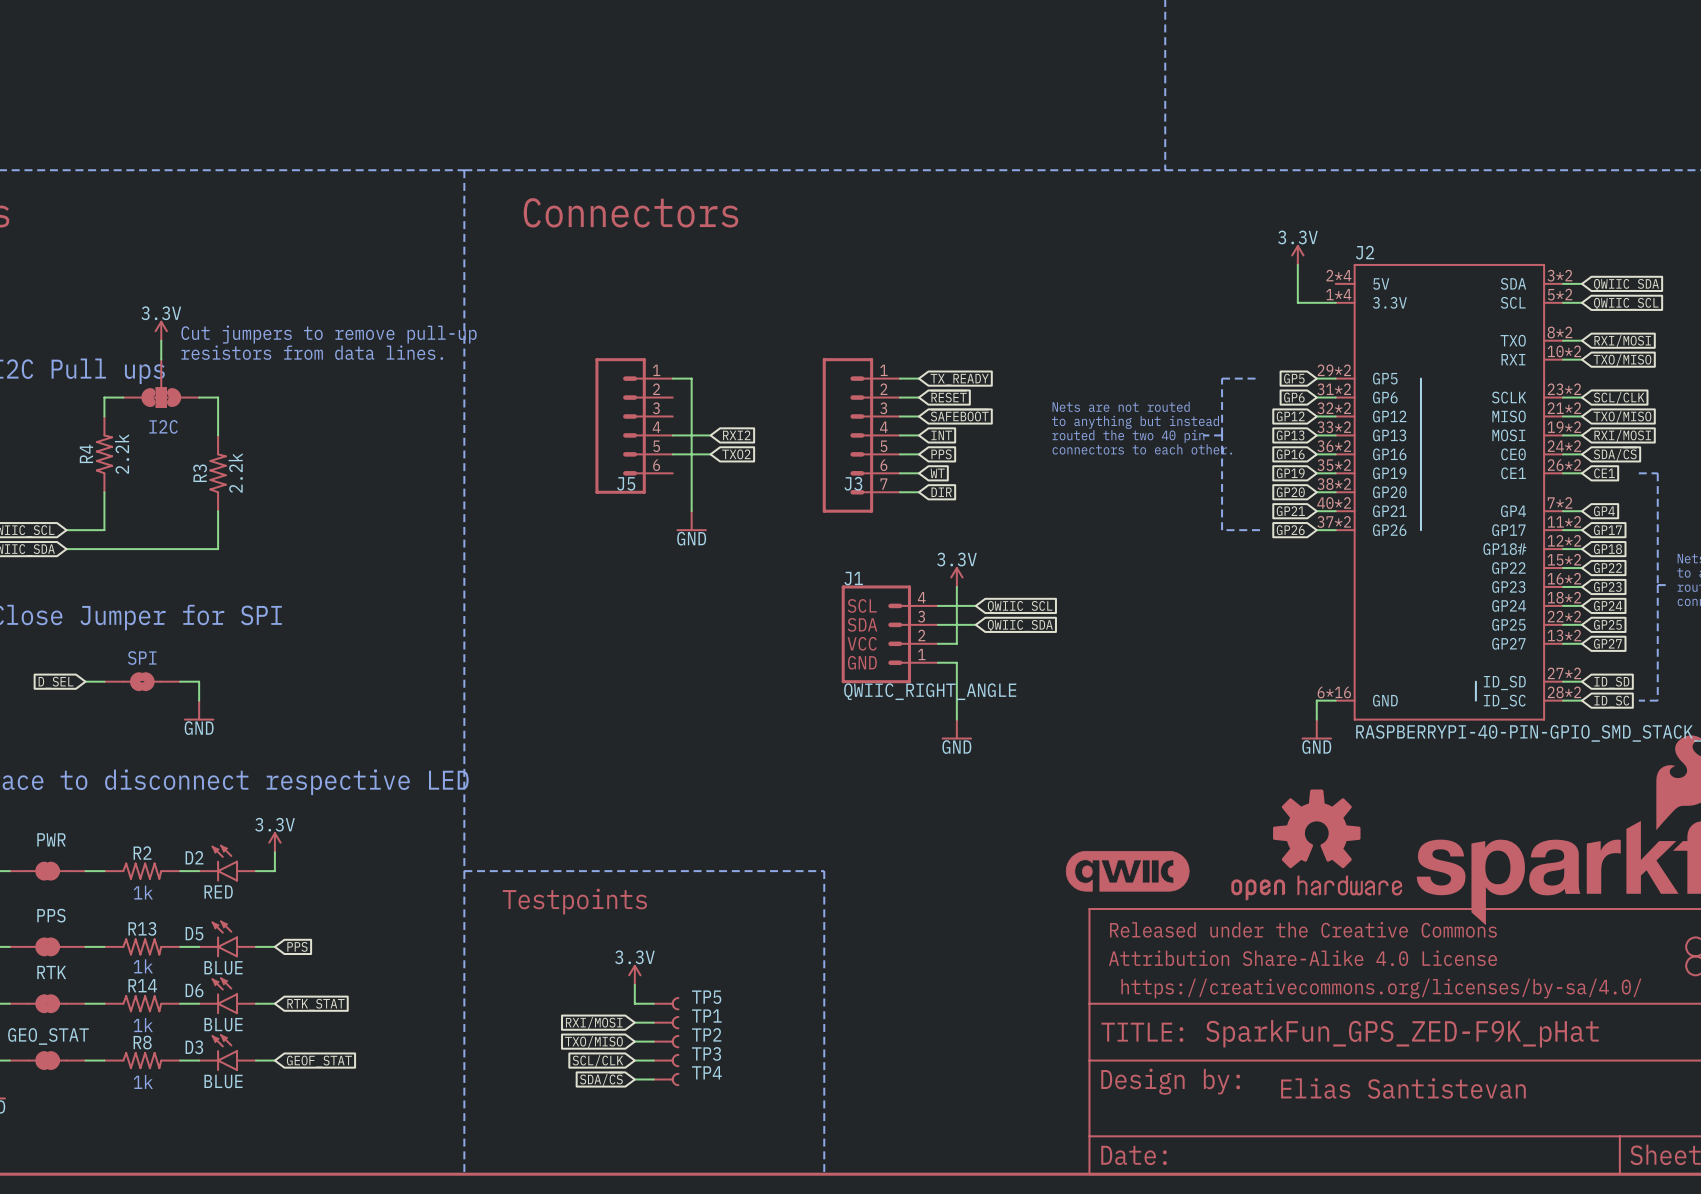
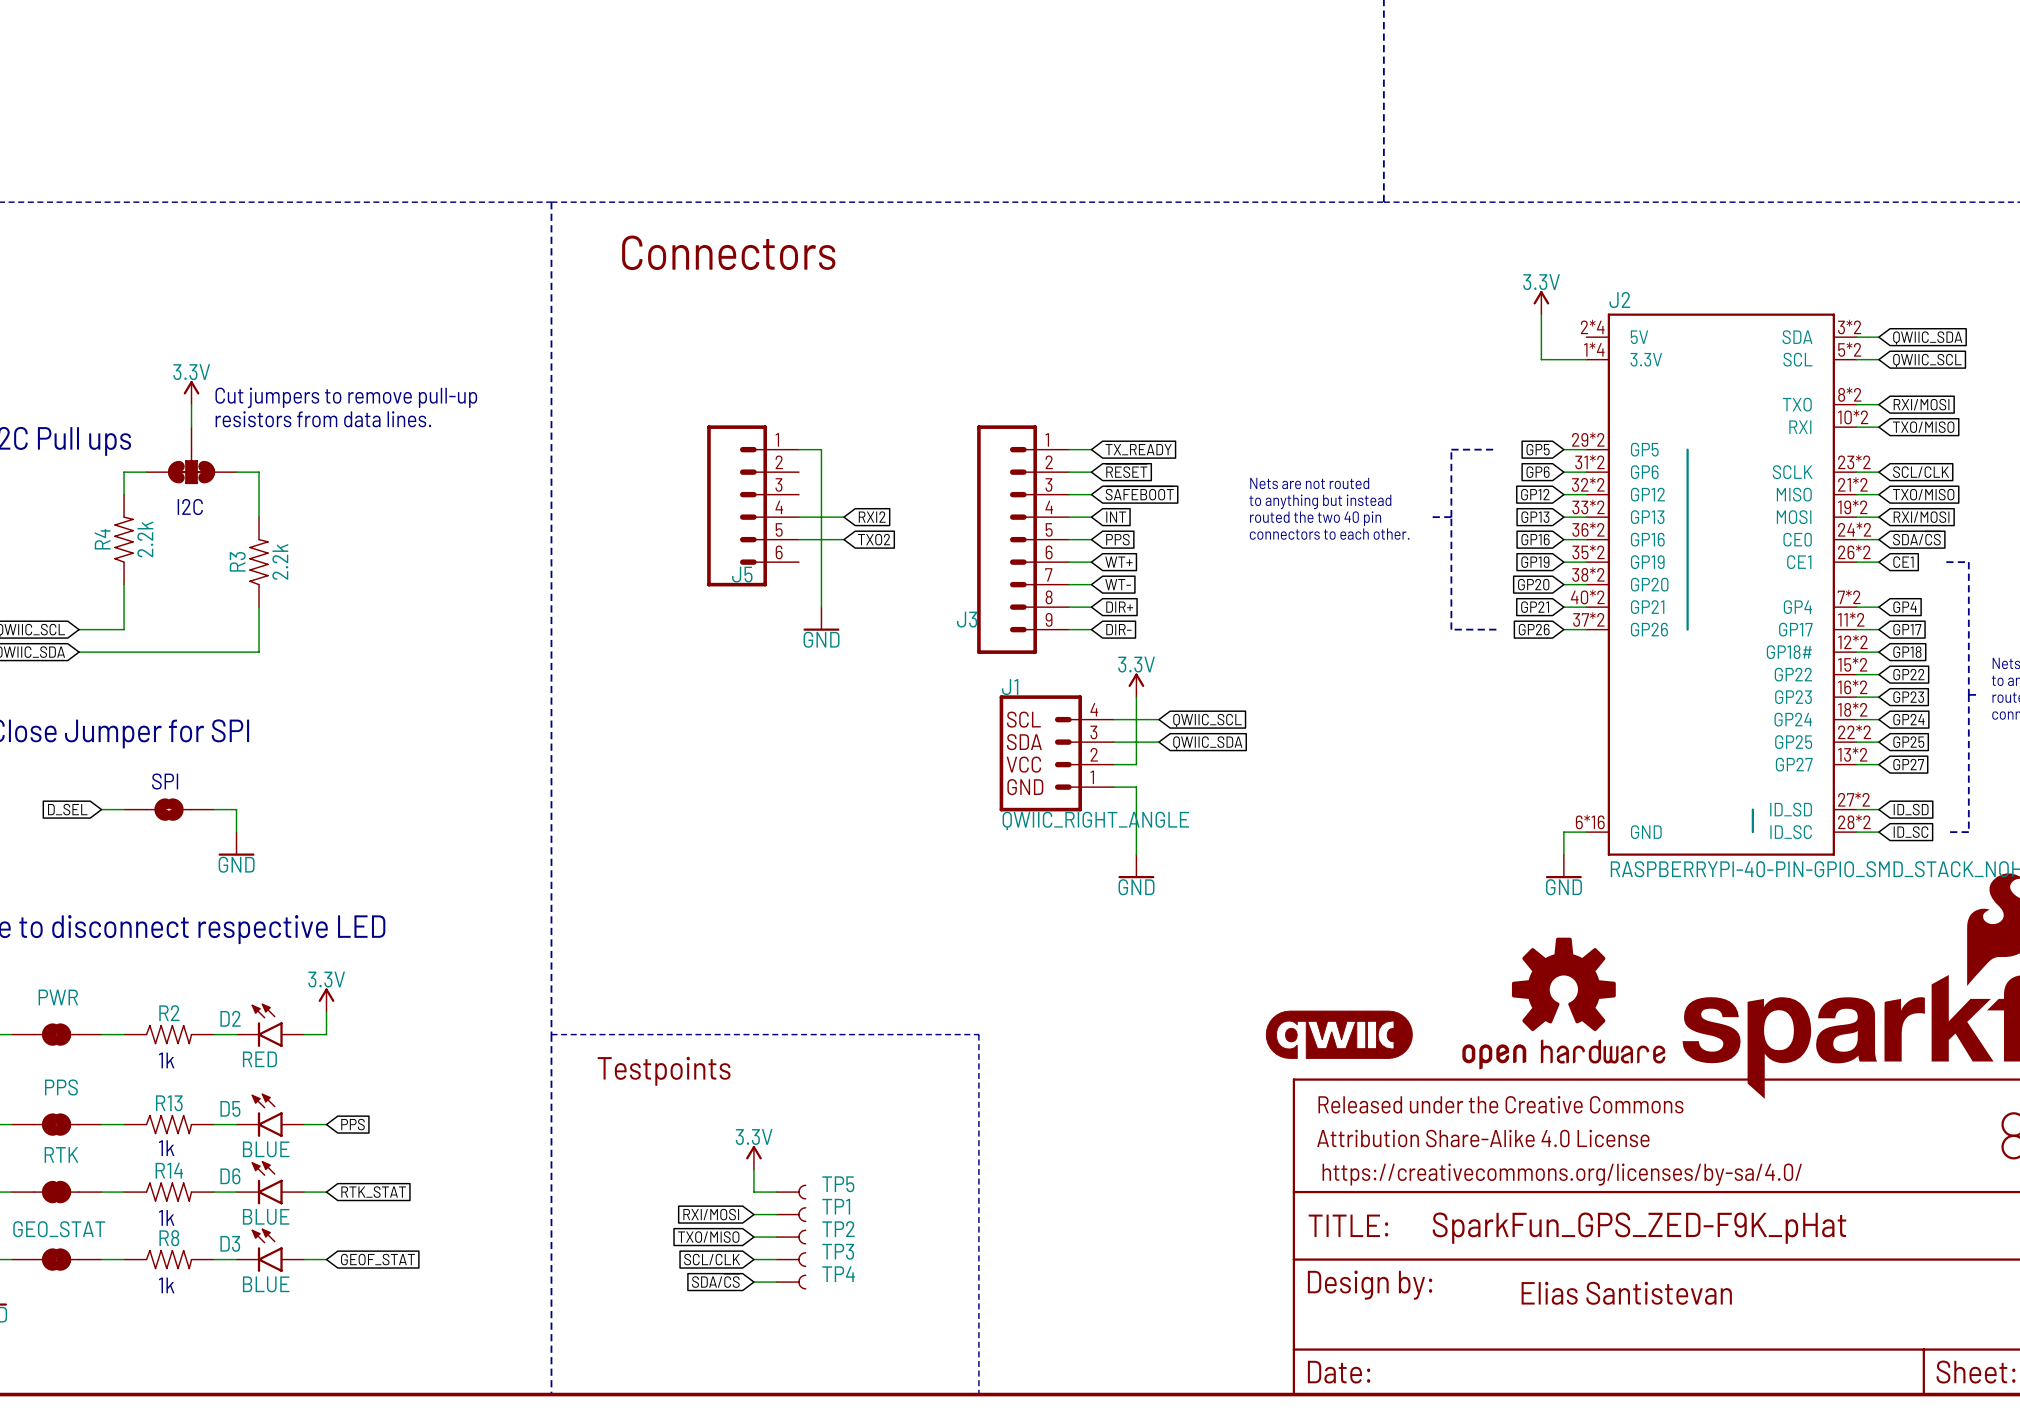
J3 symbol: [822, 358, 901, 513] -> [977, 425, 1069, 654]
global label: WT (937, 473) -> WT+ (1118, 562)
J3 name position: J3 (853, 483) -> J3 (967, 619)
global label: DIR (941, 492) -> WT- (1118, 584)
wire: none -> (1068, 607) (1091, 607)
global label: none -> DIR+ (1119, 607)
wire: none -> (1068, 629) (1091, 629)
global label: none -> DIR- (1118, 629)

